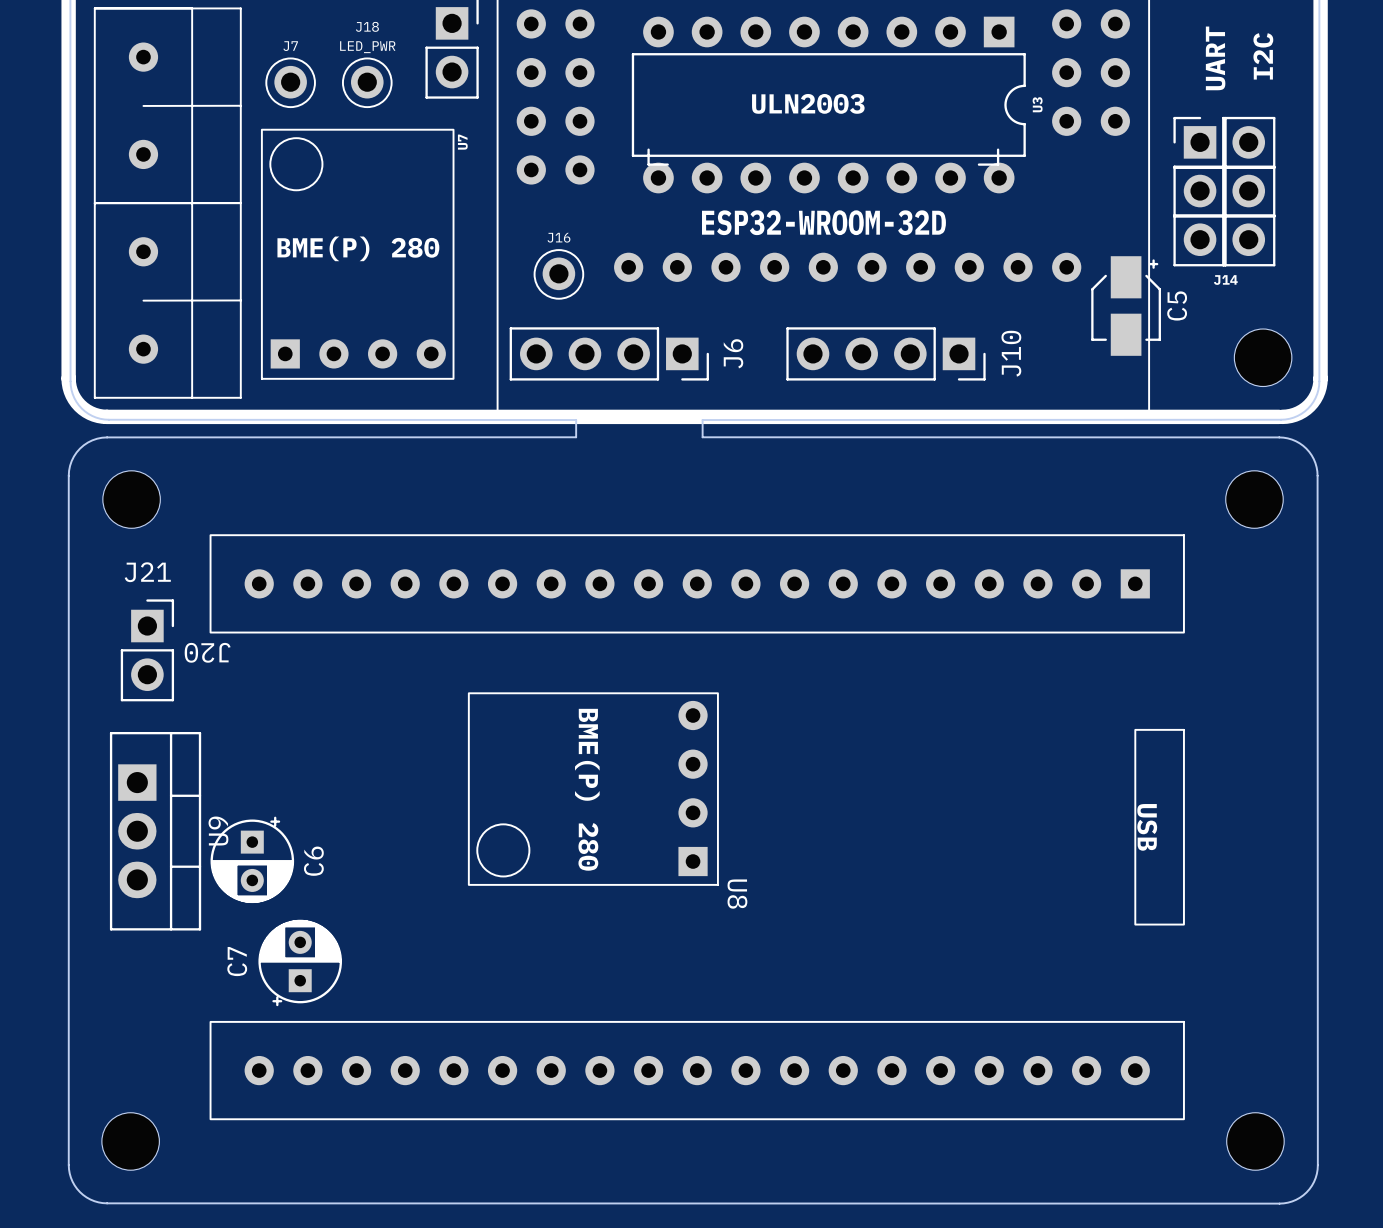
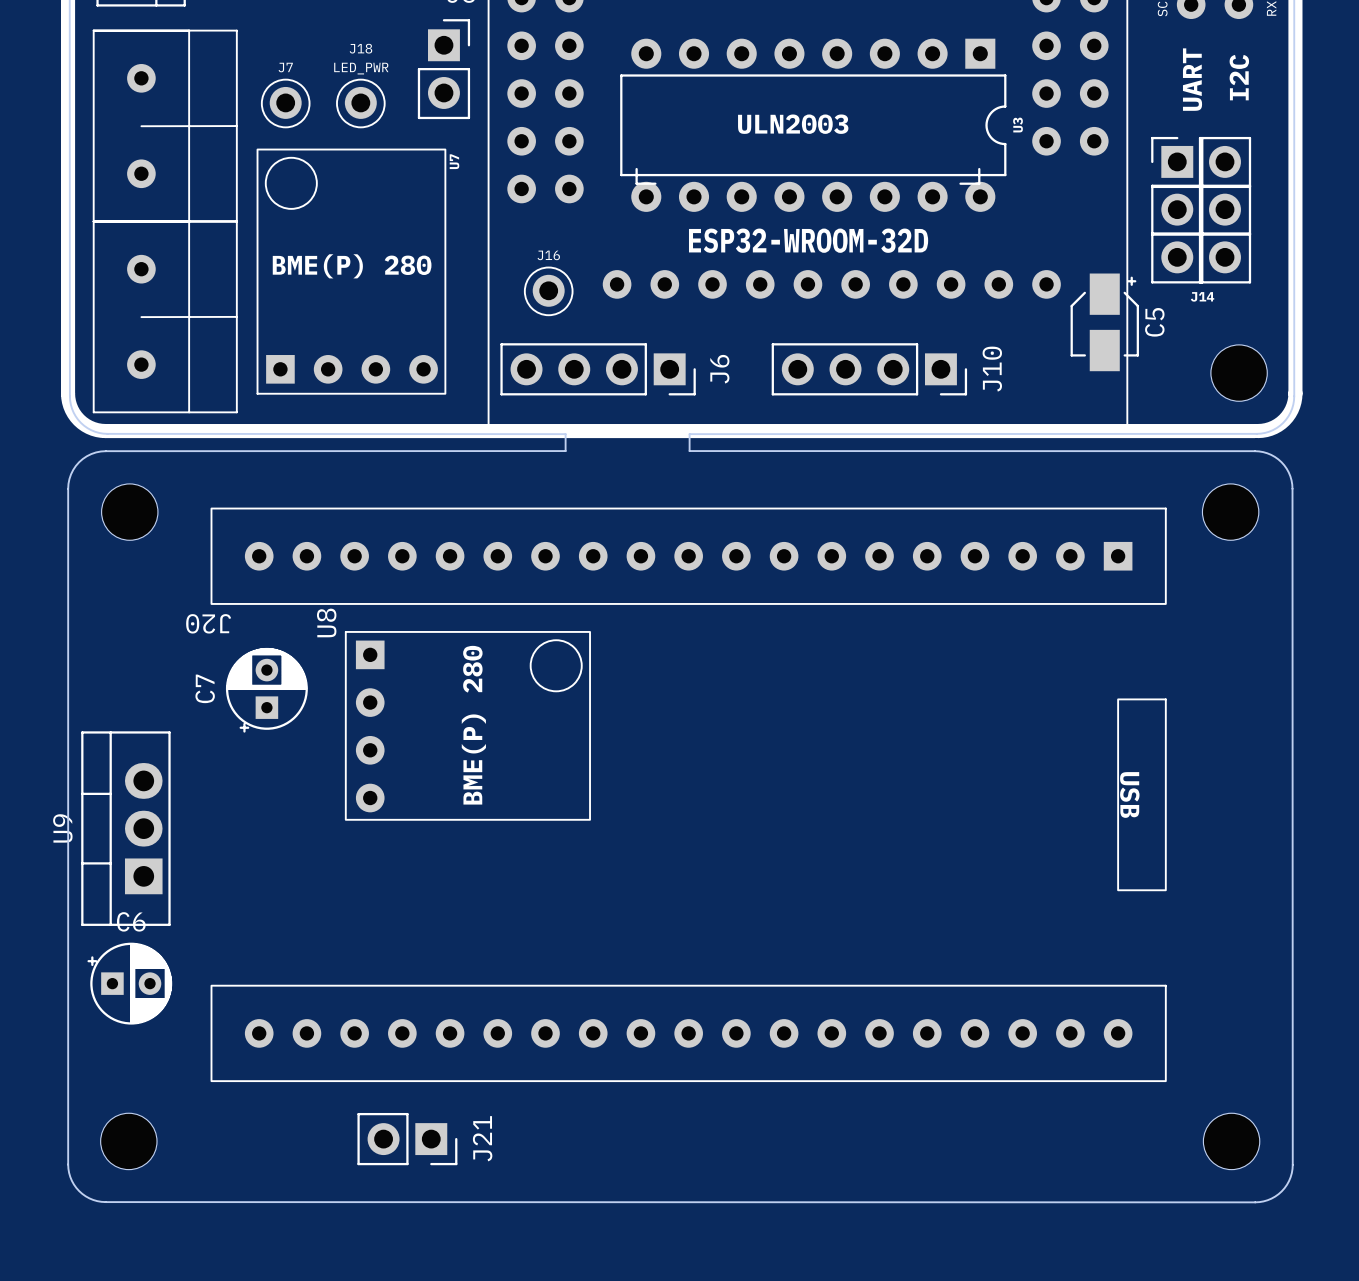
J21 rotation: 0° (147, 650) -> 90° clockwise (407, 1139)
J21 position: (147, 650) -> (407, 1139)
U8 rotation: 0° (593, 789) -> 180° (467, 725)
J20 position: (697, 827) -> (688, 794)
U9 rotation: 0° (155, 831) -> 180° (125, 828)
C6 rotation: 0° (252, 859) -> 90° counterclockwise (129, 983)
C6 position: (252, 859) -> (129, 983)
C7 position: (300, 962) -> (266, 690)

